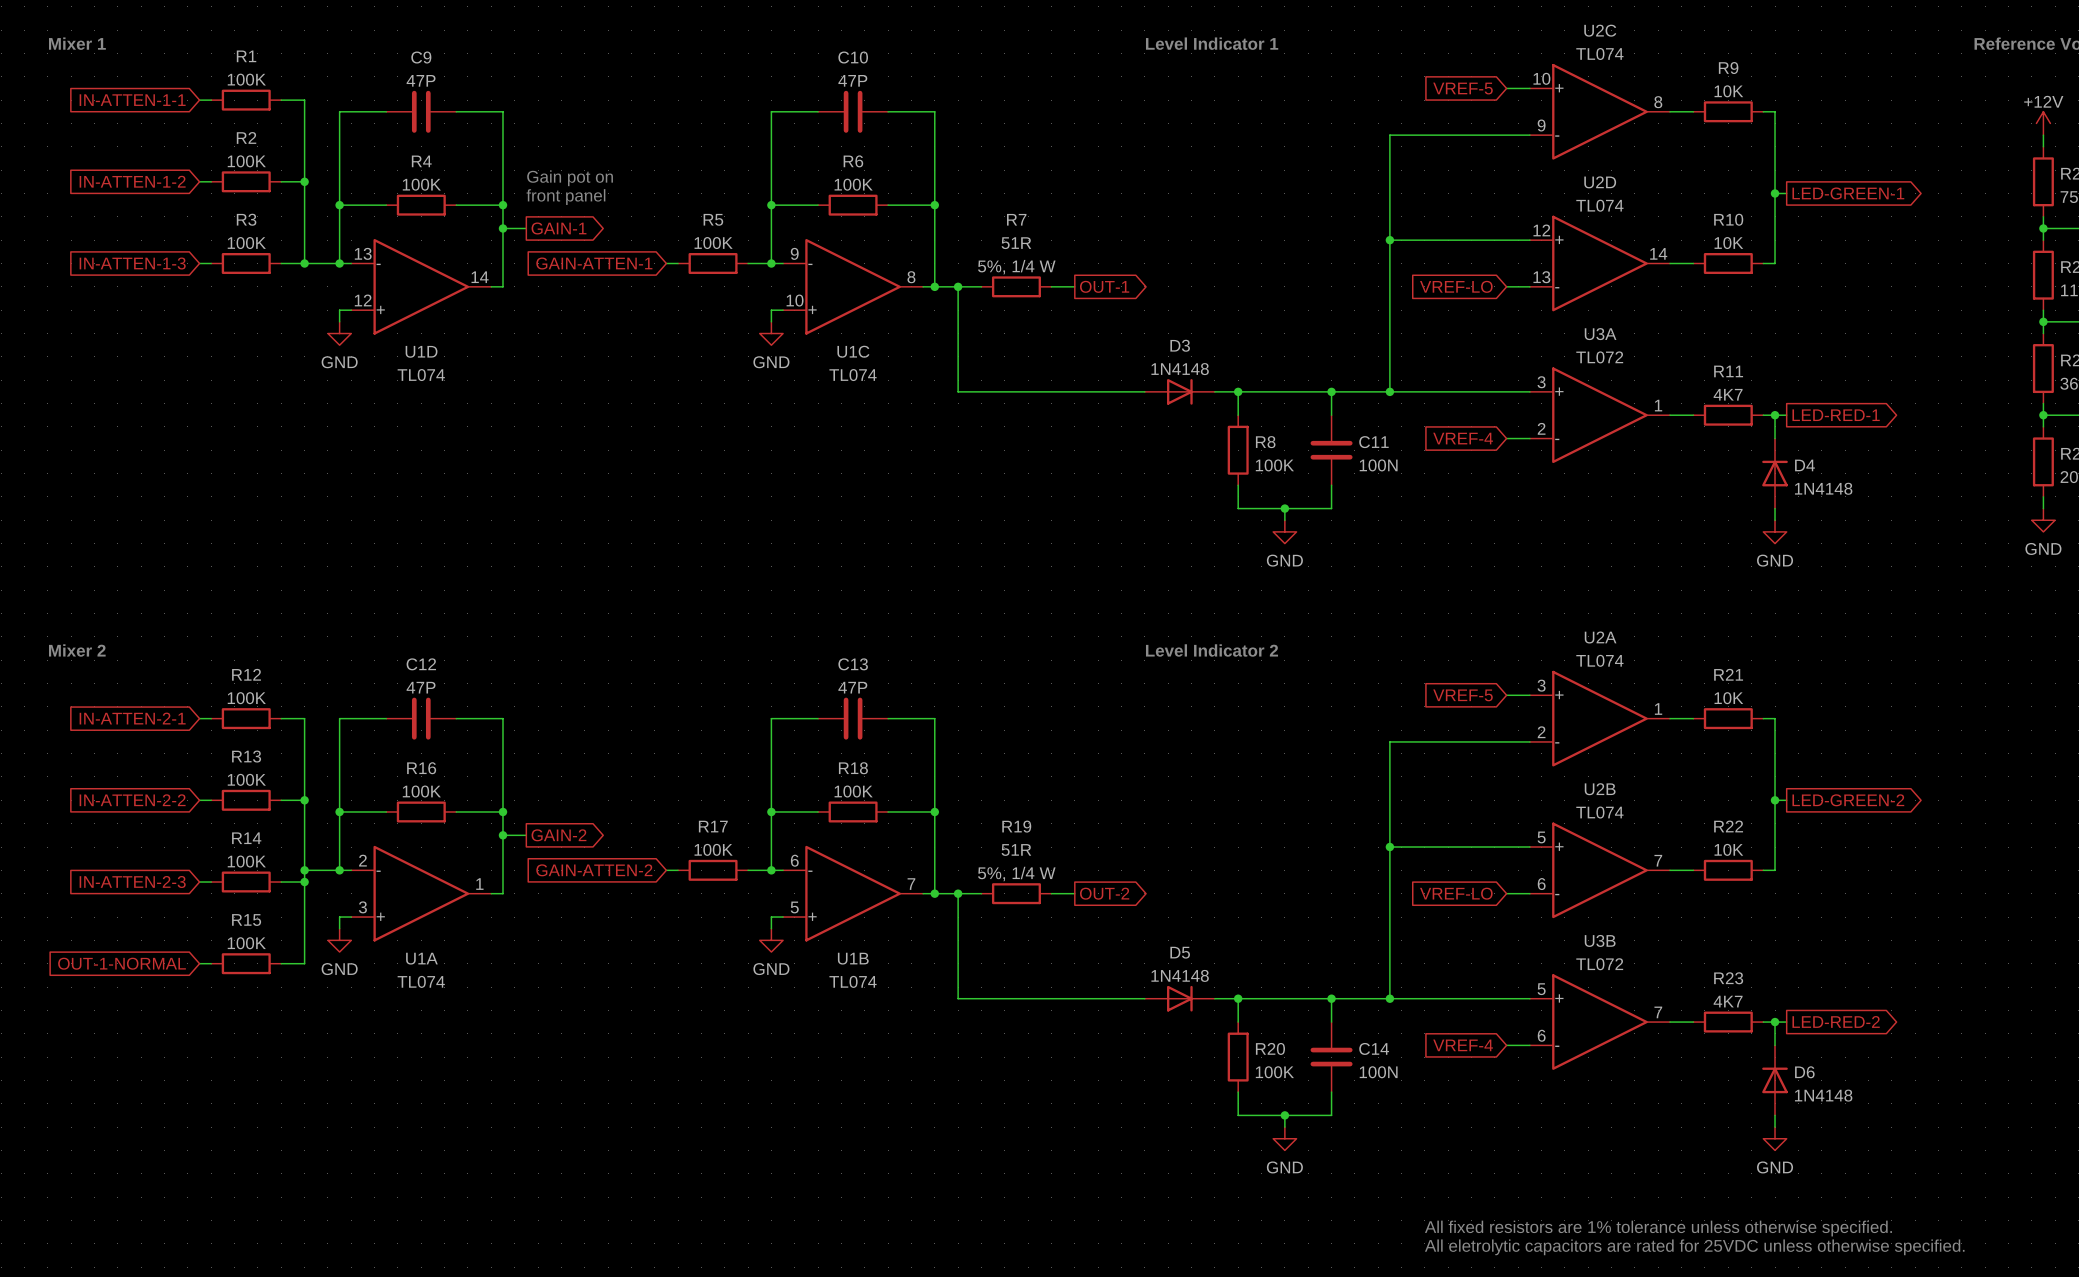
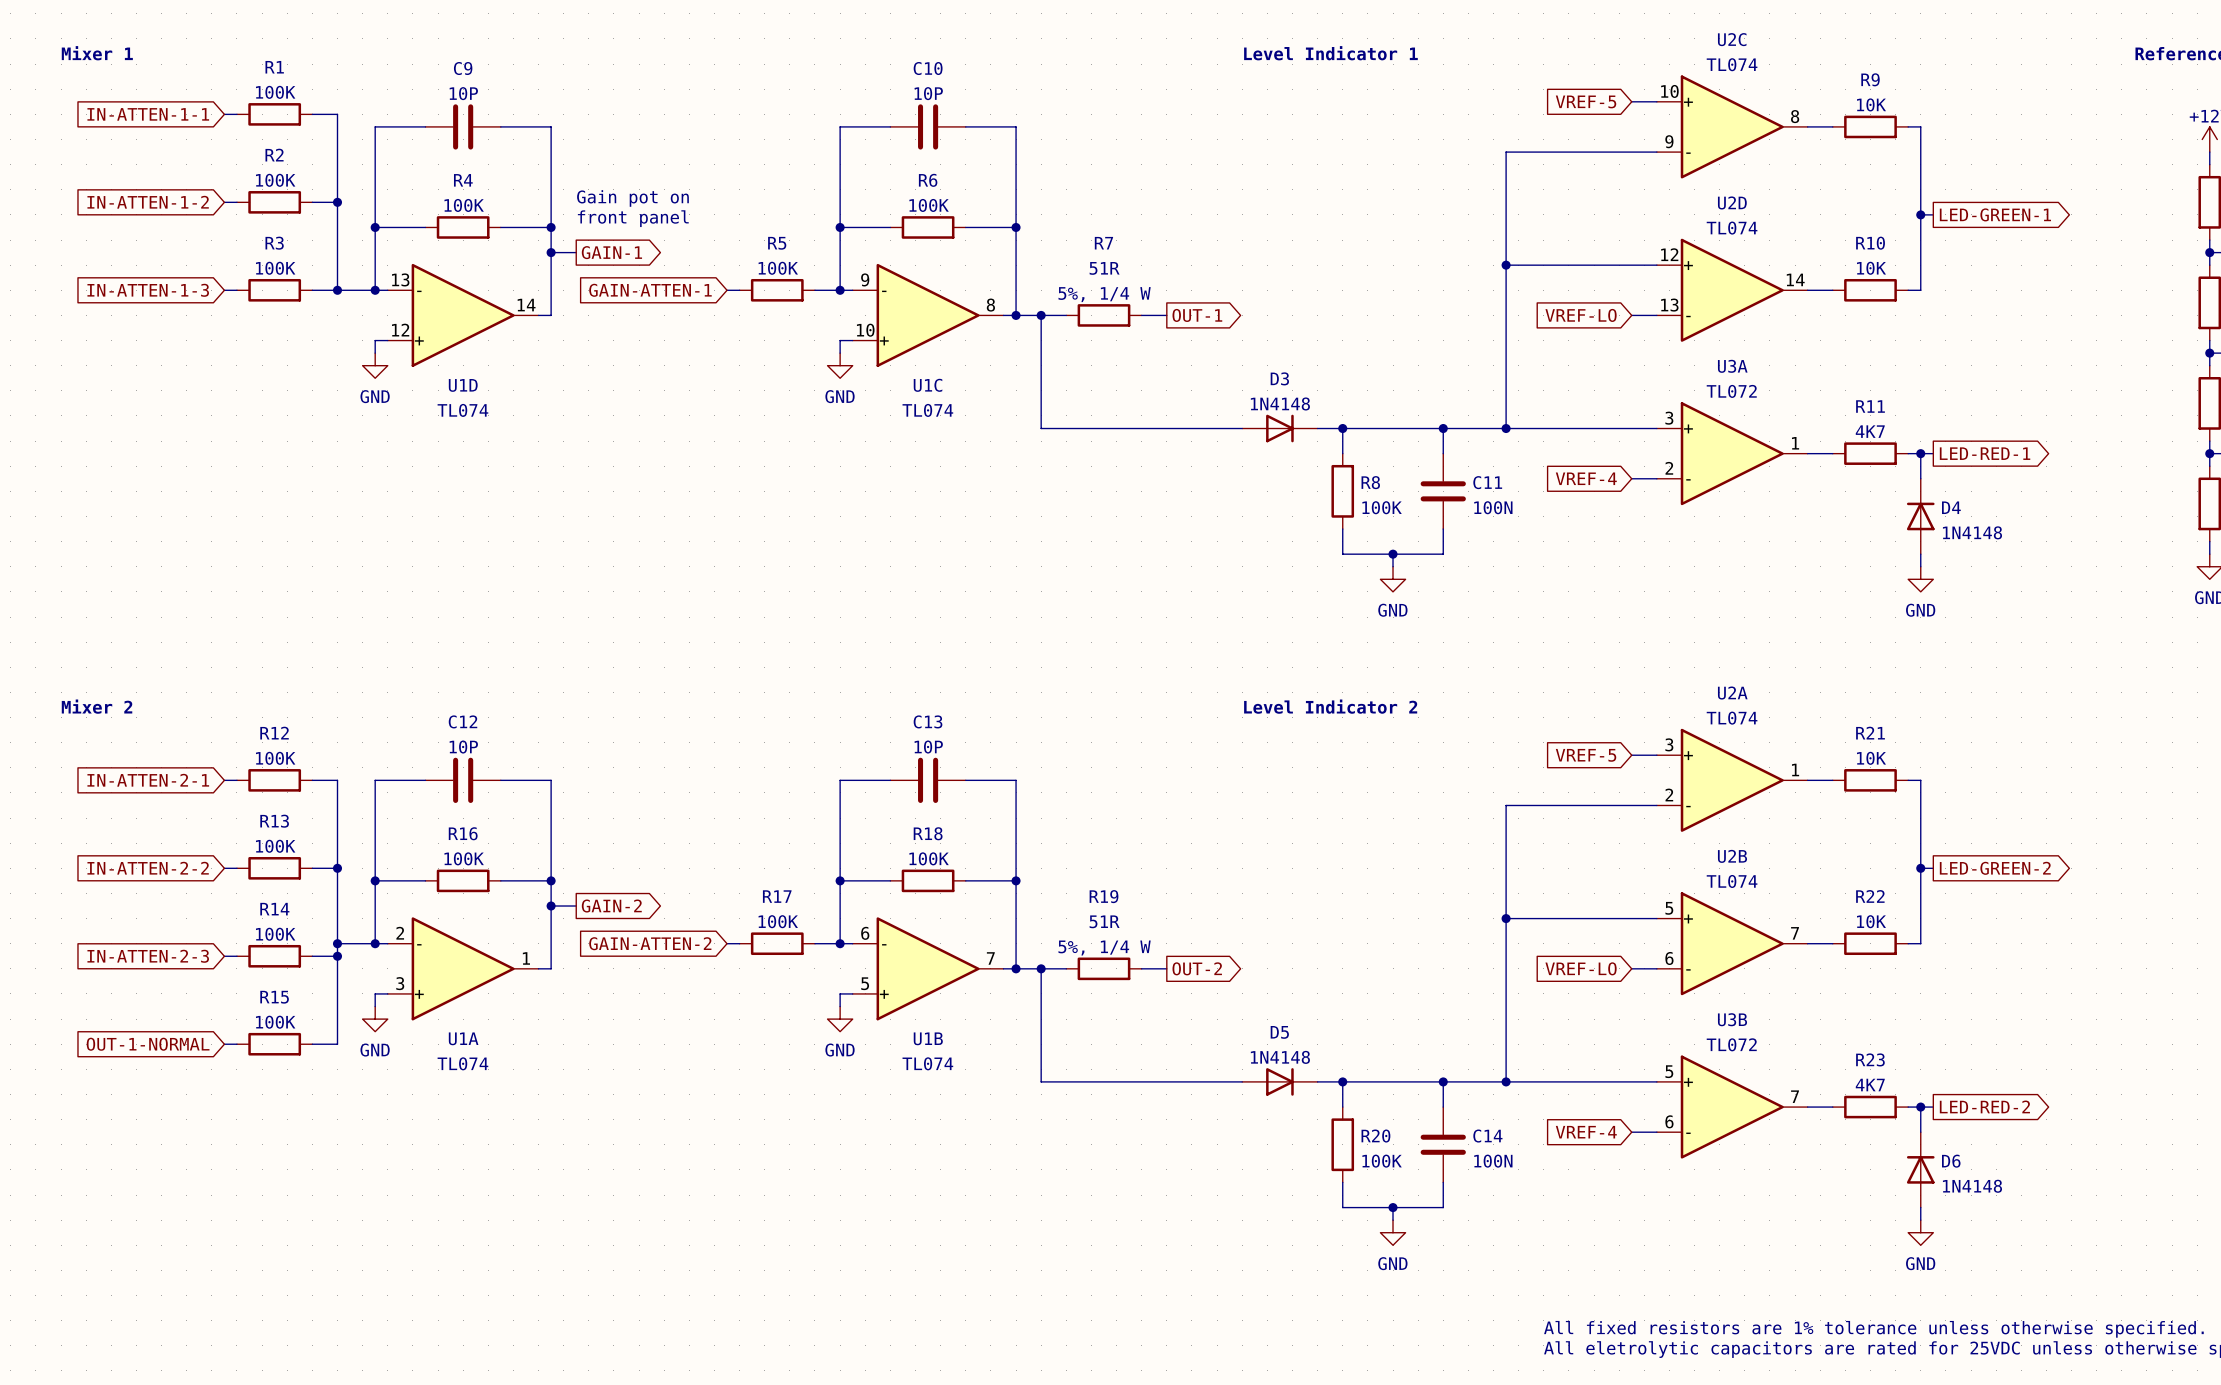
C9 value: 47P (421, 80) -> 10P (463, 93)
C10 value: 47P (852, 80) -> 10P (928, 93)
C12 value: 47P (421, 687) -> 10P (463, 747)
C13 value: 47P (852, 687) -> 10P (928, 747)

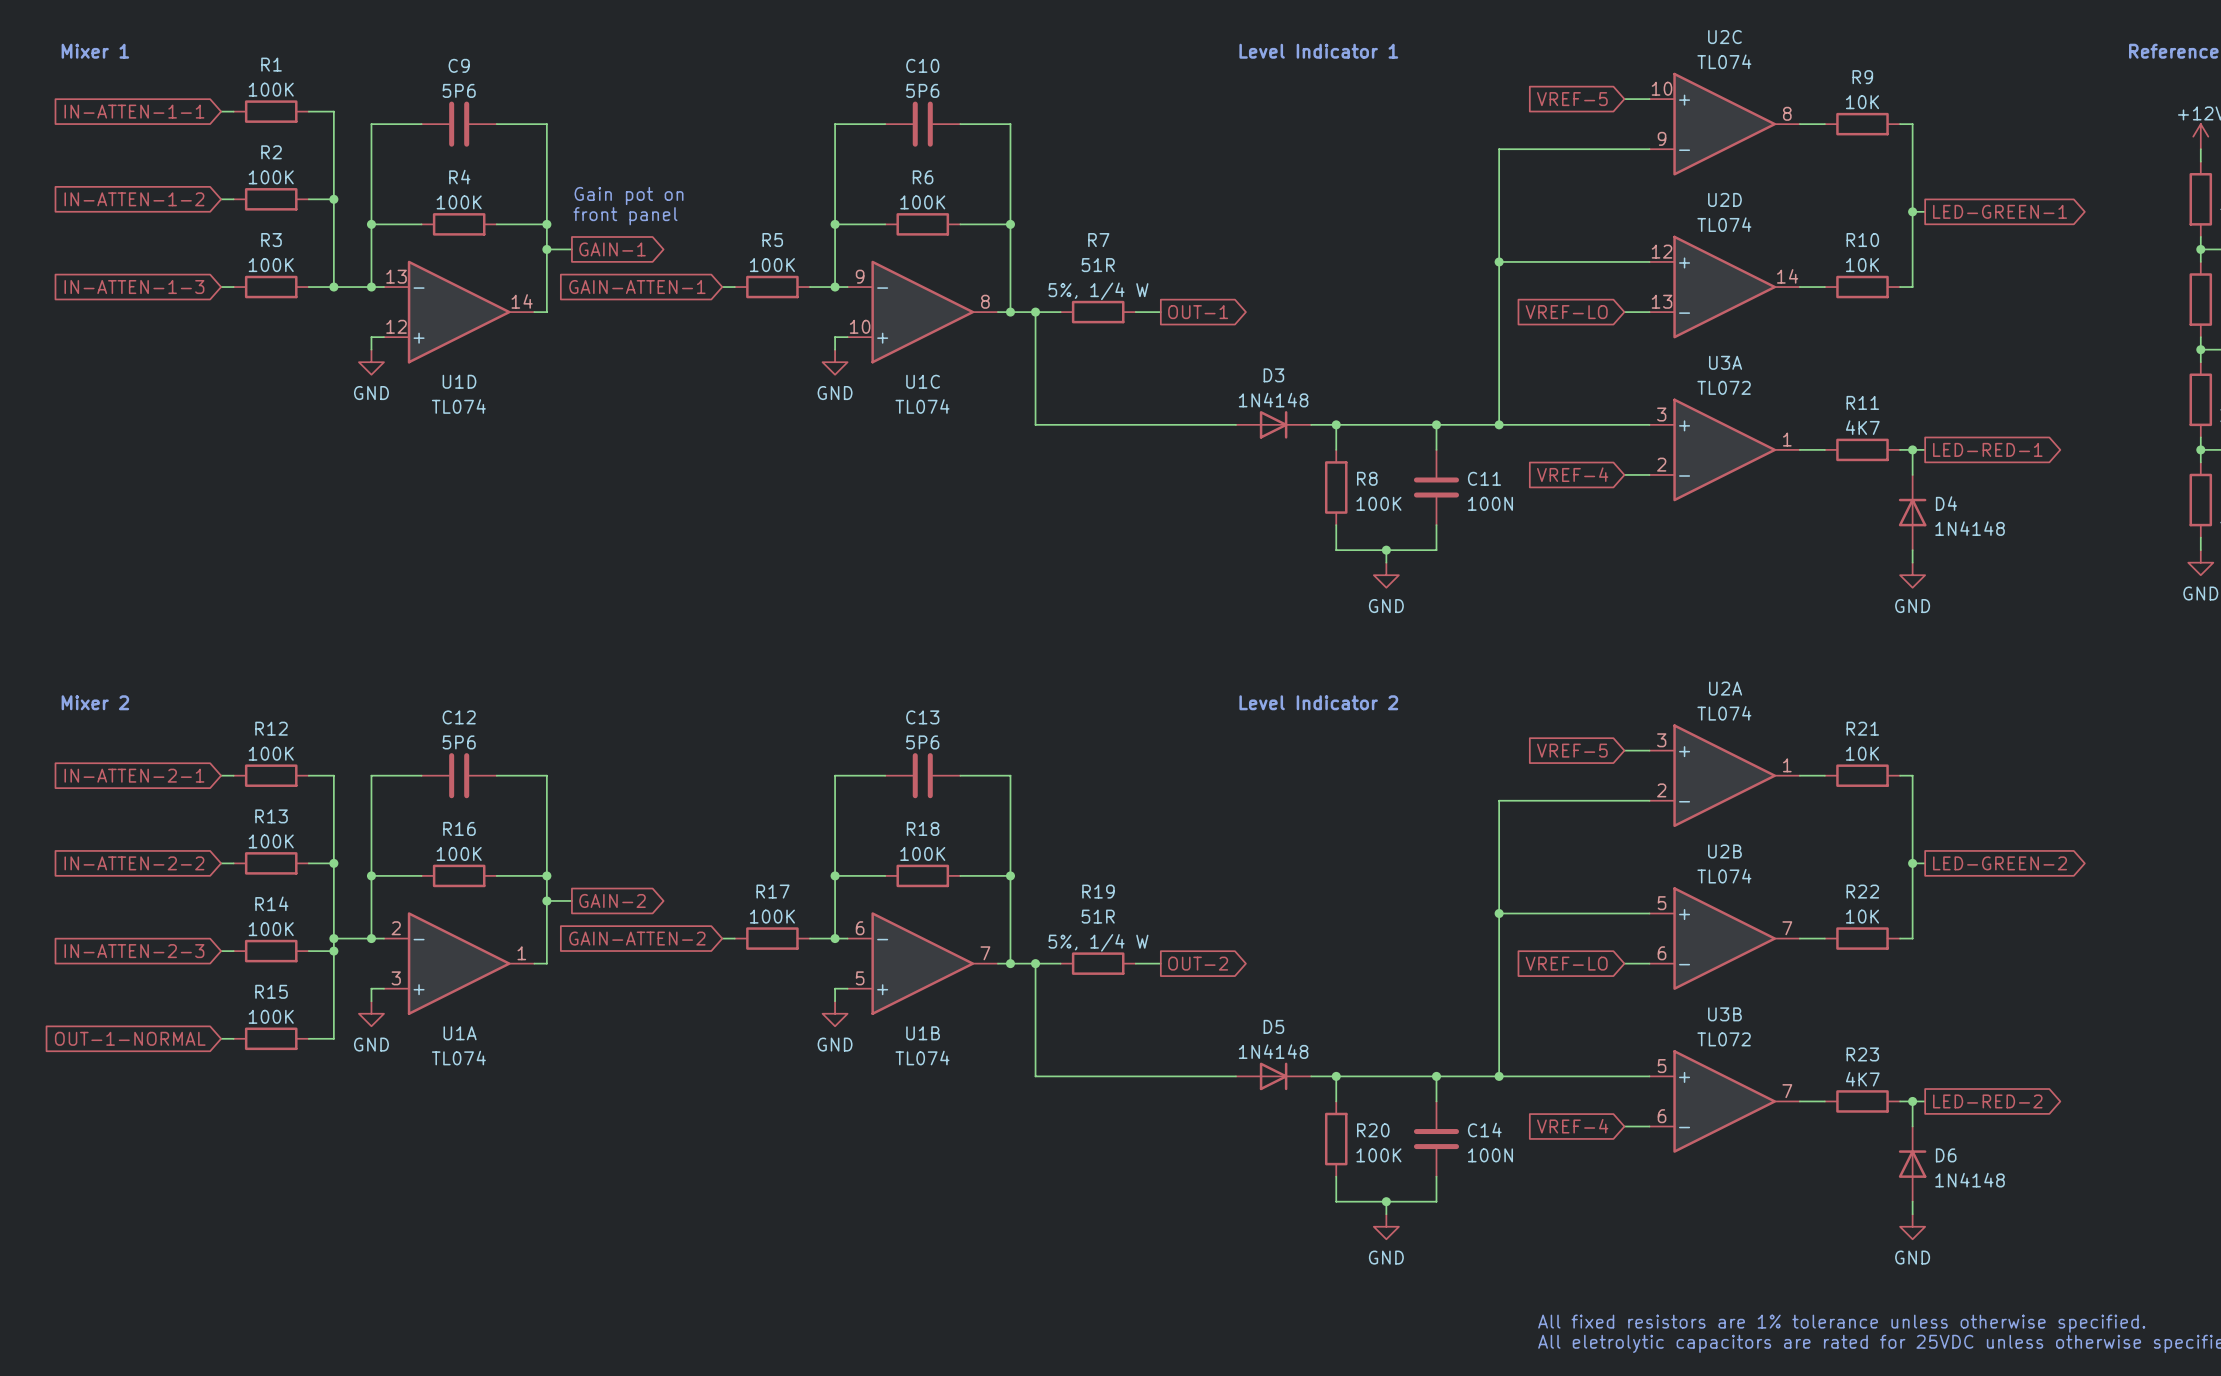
C9 value: 10P (463, 93) -> 5P6 (459, 90)
C10 value: 10P (928, 93) -> 5P6 (922, 90)
C12 value: 10P (463, 747) -> 5P6 (459, 742)
C13 value: 10P (928, 747) -> 5P6 (922, 742)

